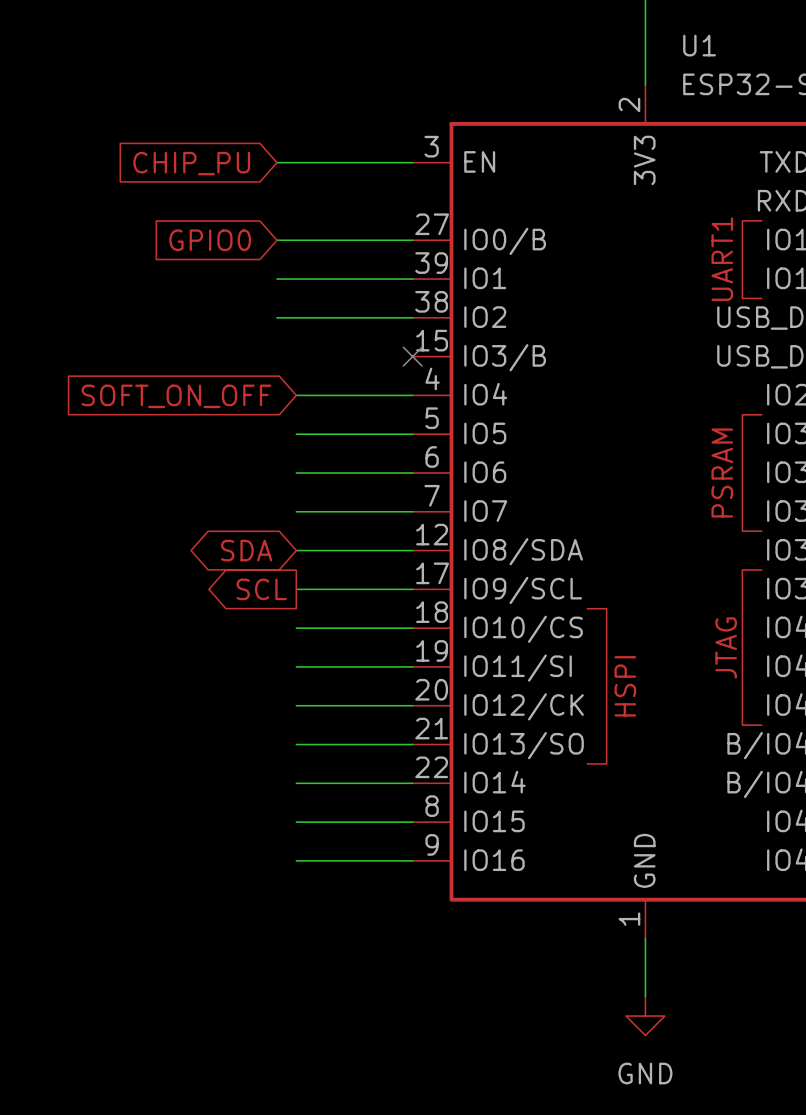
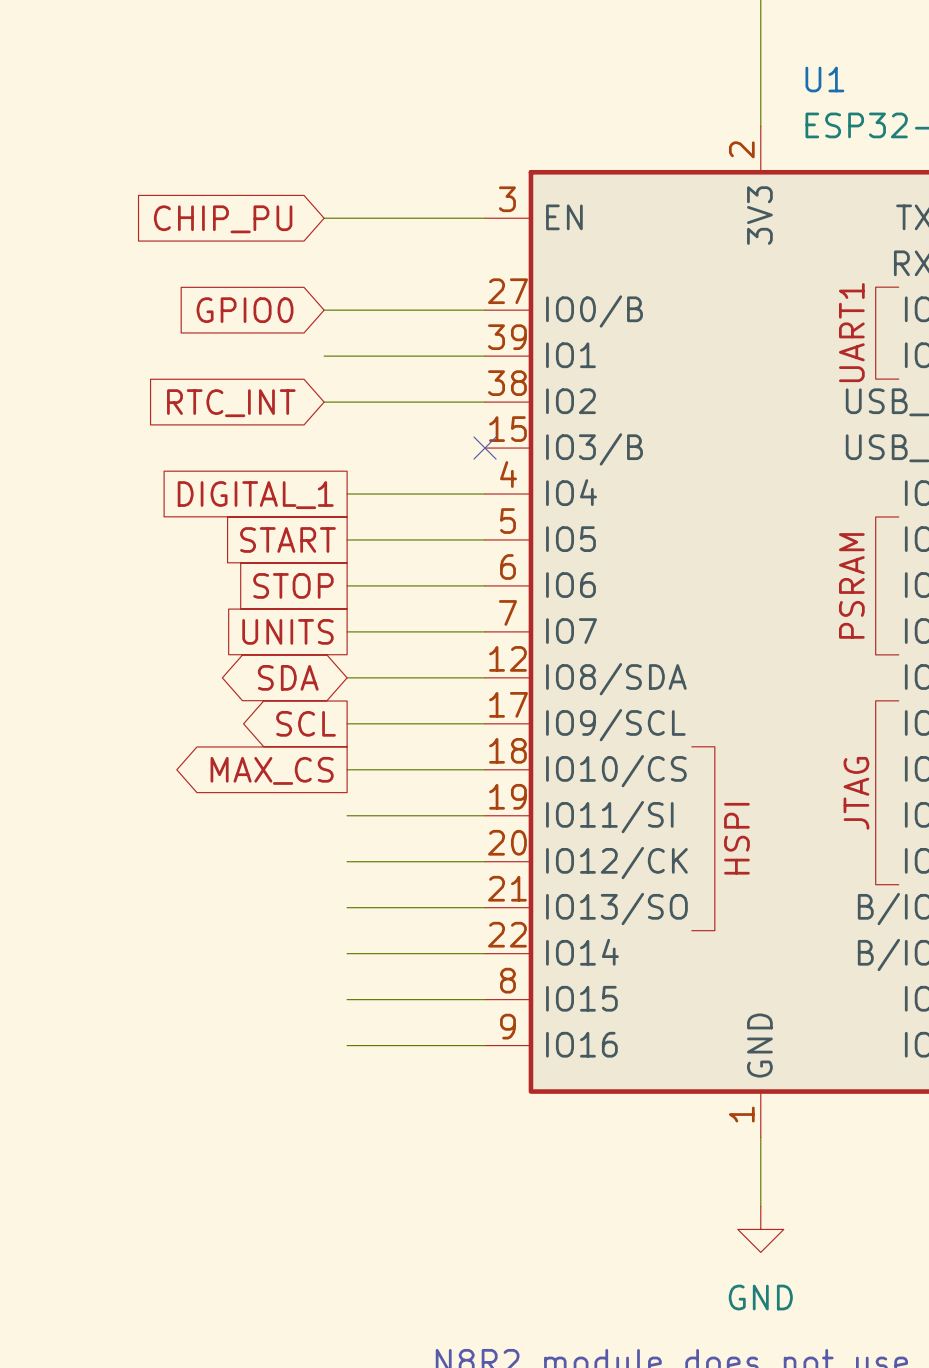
global label: none -> RTC_INT (231, 403)
global label shape: input (176, 396) -> passive (255, 495)
global label: SOFT_ON_OFF (176, 396) -> DIGITAL_1 (255, 495)
global label: none -> START (287, 539)
global label: none -> STOP (293, 585)
global label: none -> UNITS (287, 631)
global label: none -> MAX_CS (272, 770)

